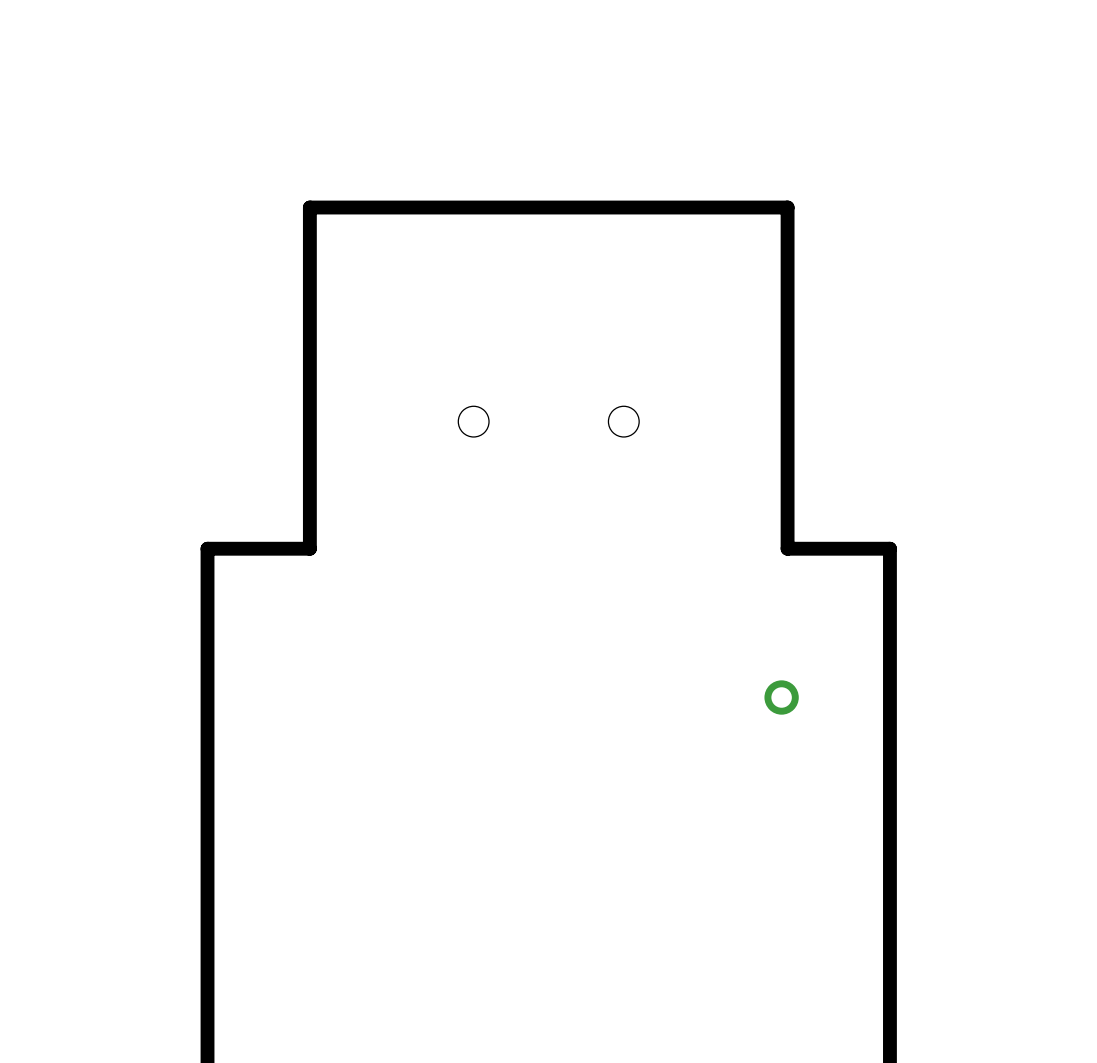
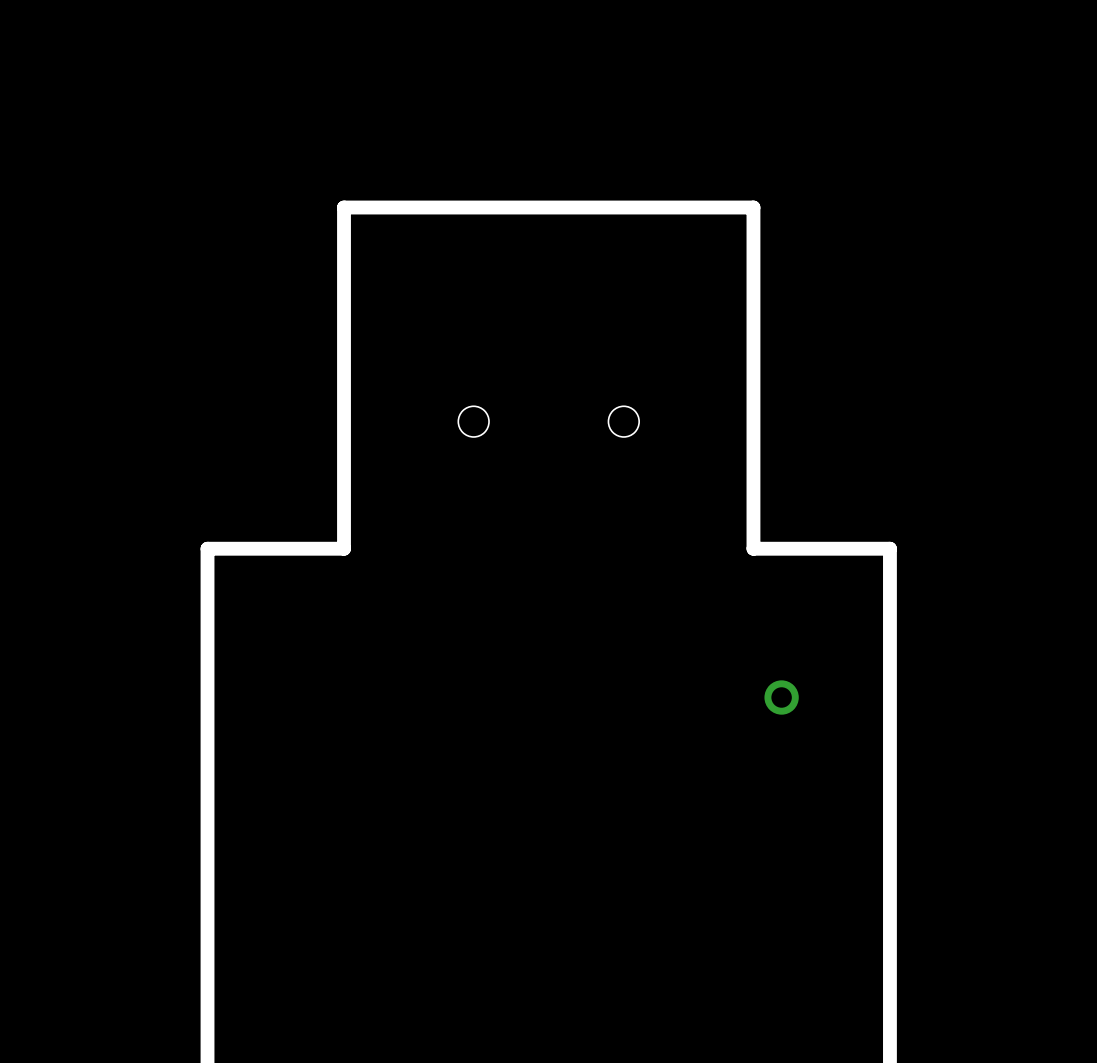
board edge: (344, 207) (309, 207) (309, 548) -> (344, 207) (344, 548) (309, 548)
board edge: (753, 207) (787, 207) (787, 548) -> (753, 207) (753, 548) (787, 548)

